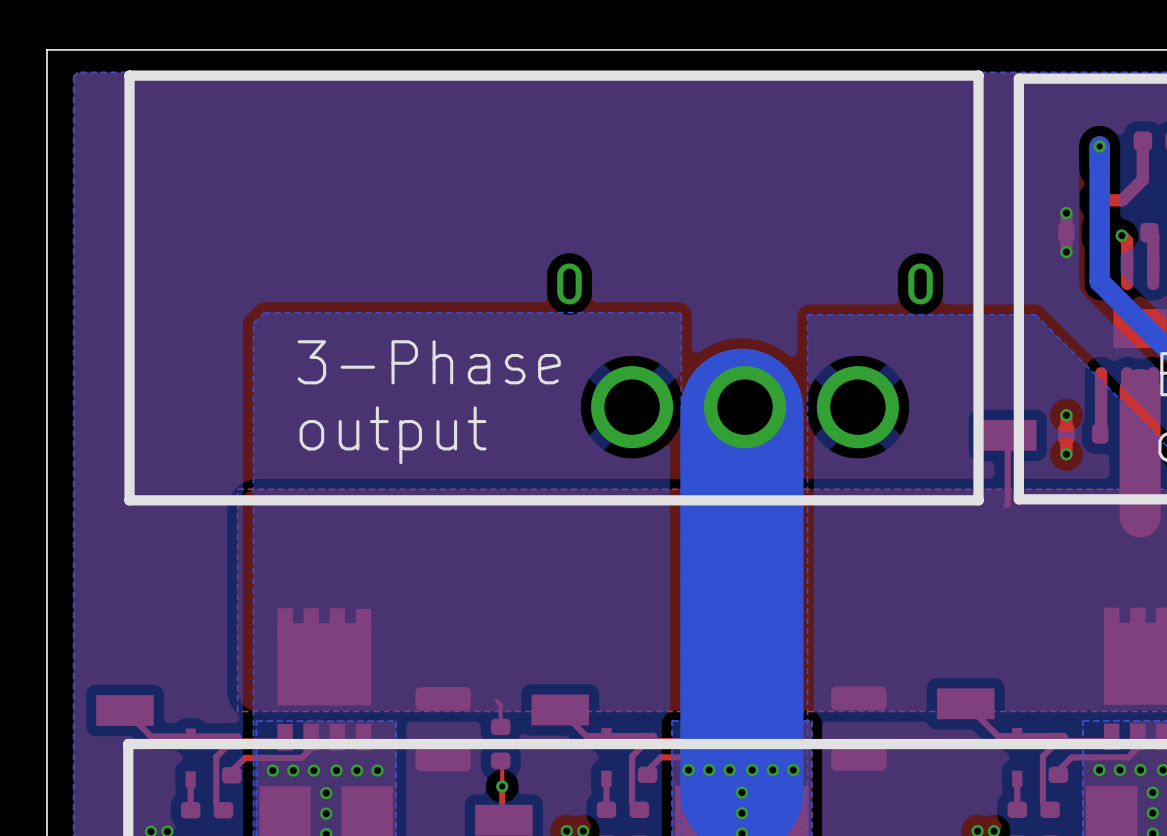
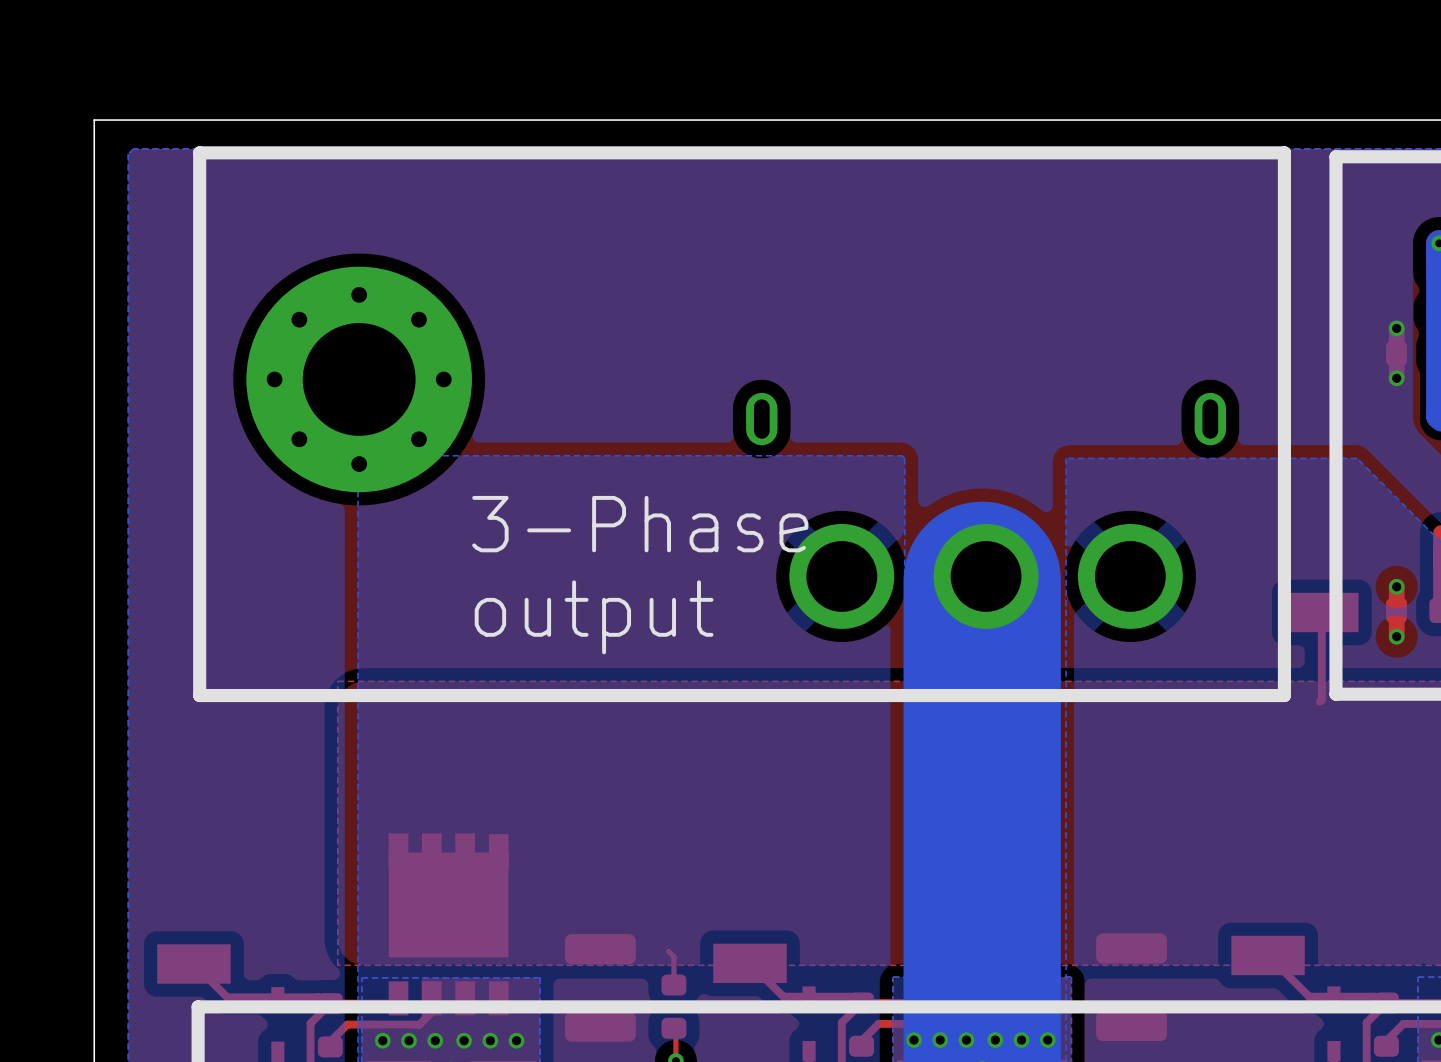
part: none -> (359, 379)
text position: 3-Phase (429, 362) -> 3-Phase (640, 524)
text position: output (393, 435) -> output (594, 617)

